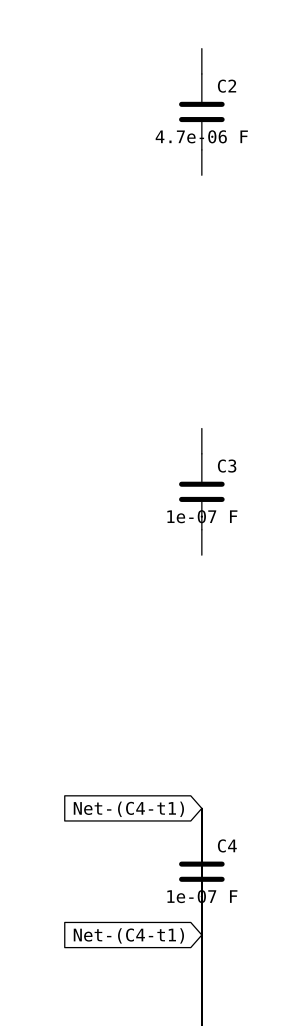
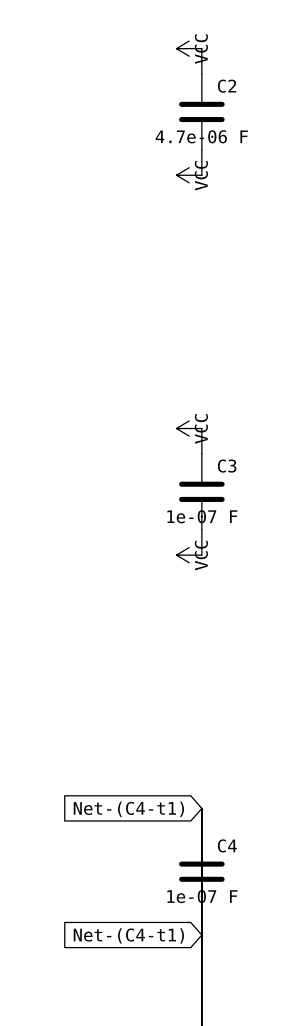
power symbol: none -> VCC (189, 48)
power symbol: none -> VCC (189, 175)
power symbol: none -> VCC (189, 428)
power symbol: none -> VCC (189, 555)

